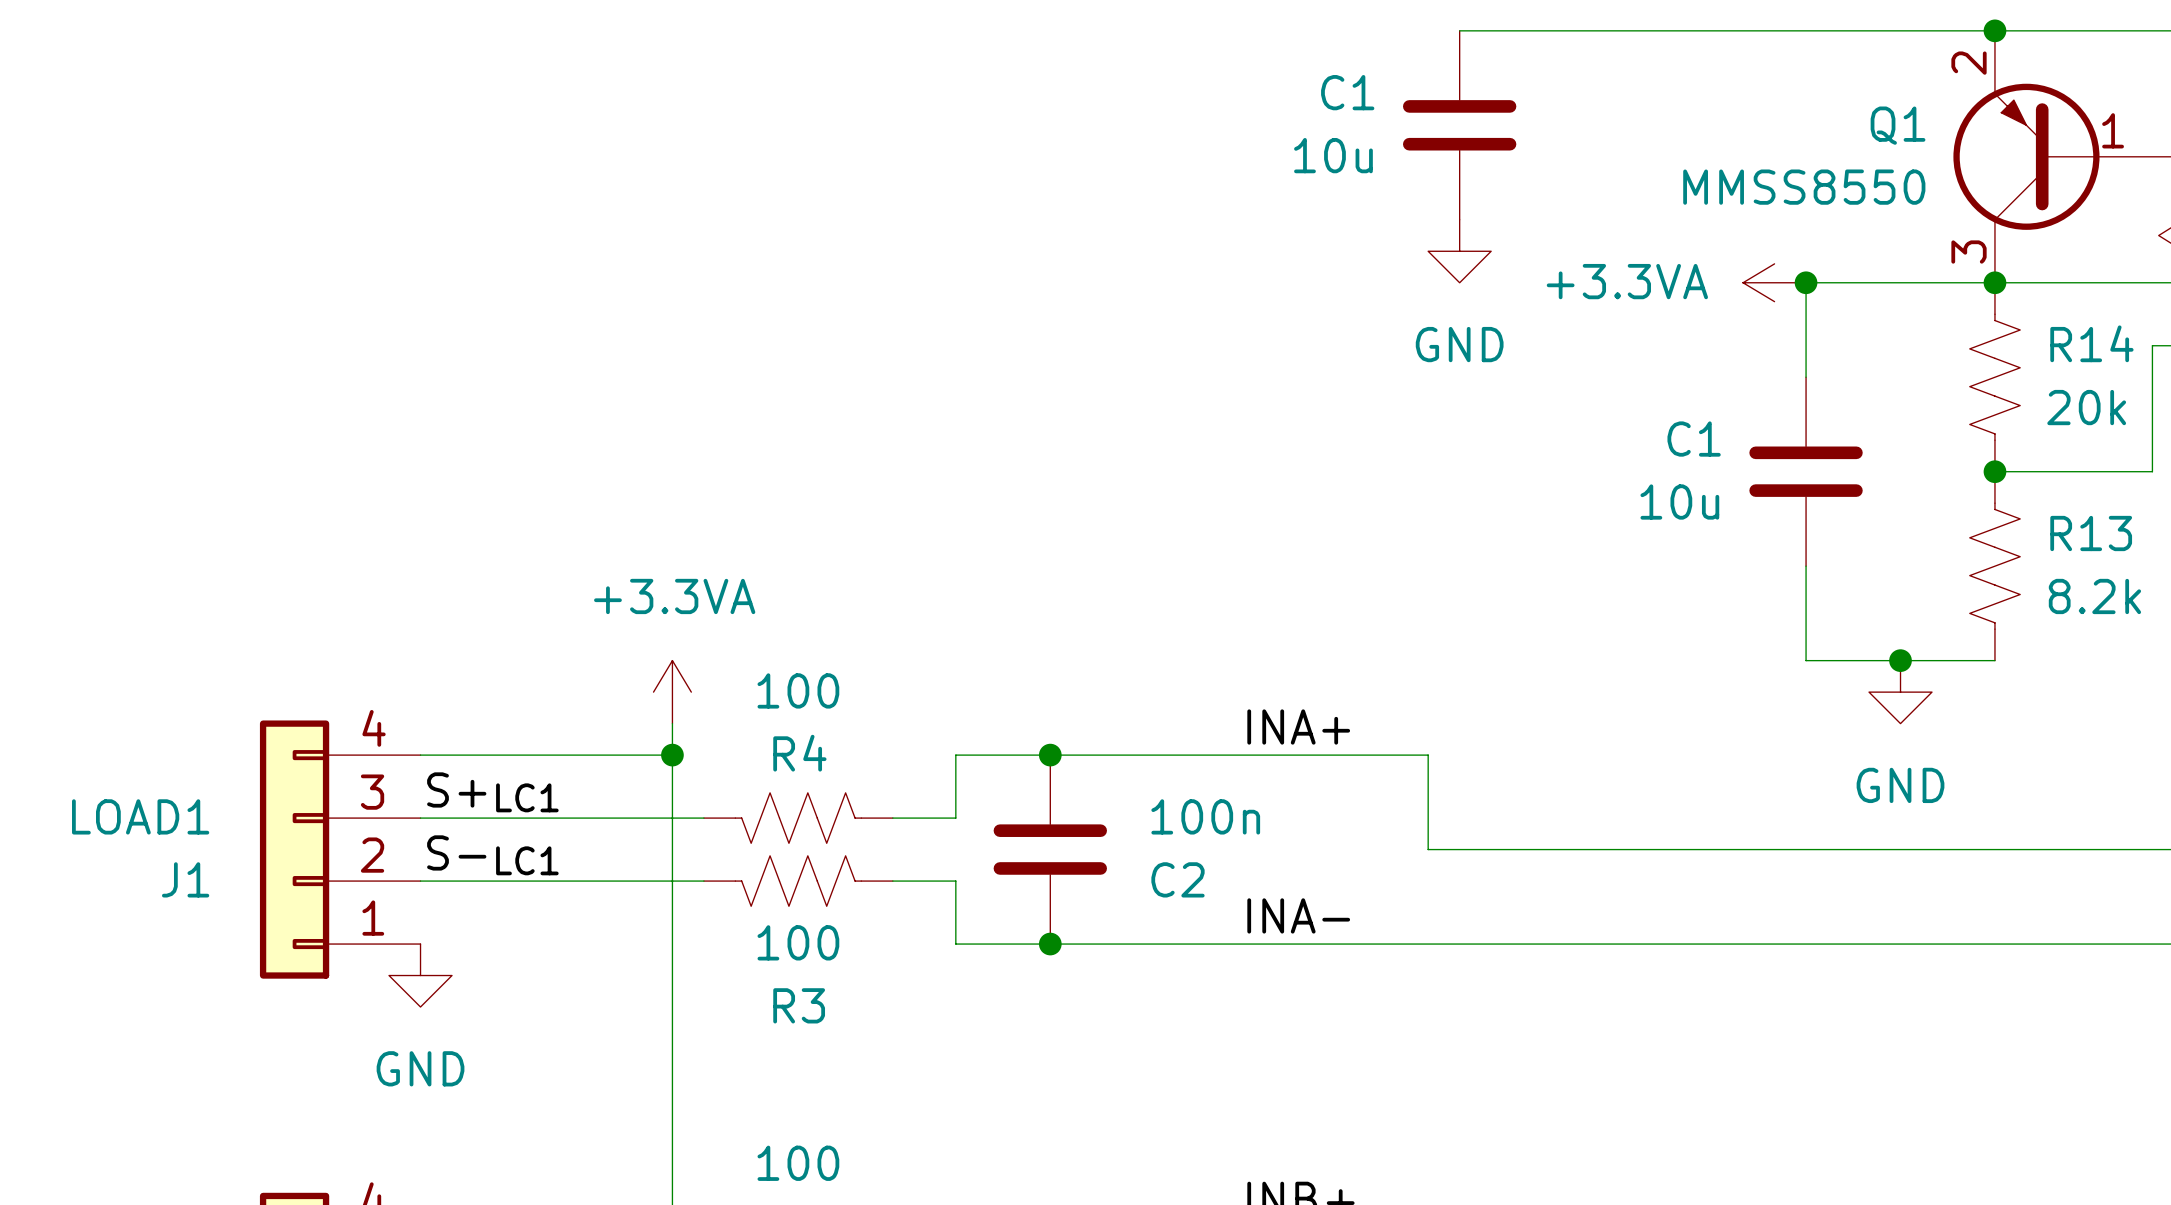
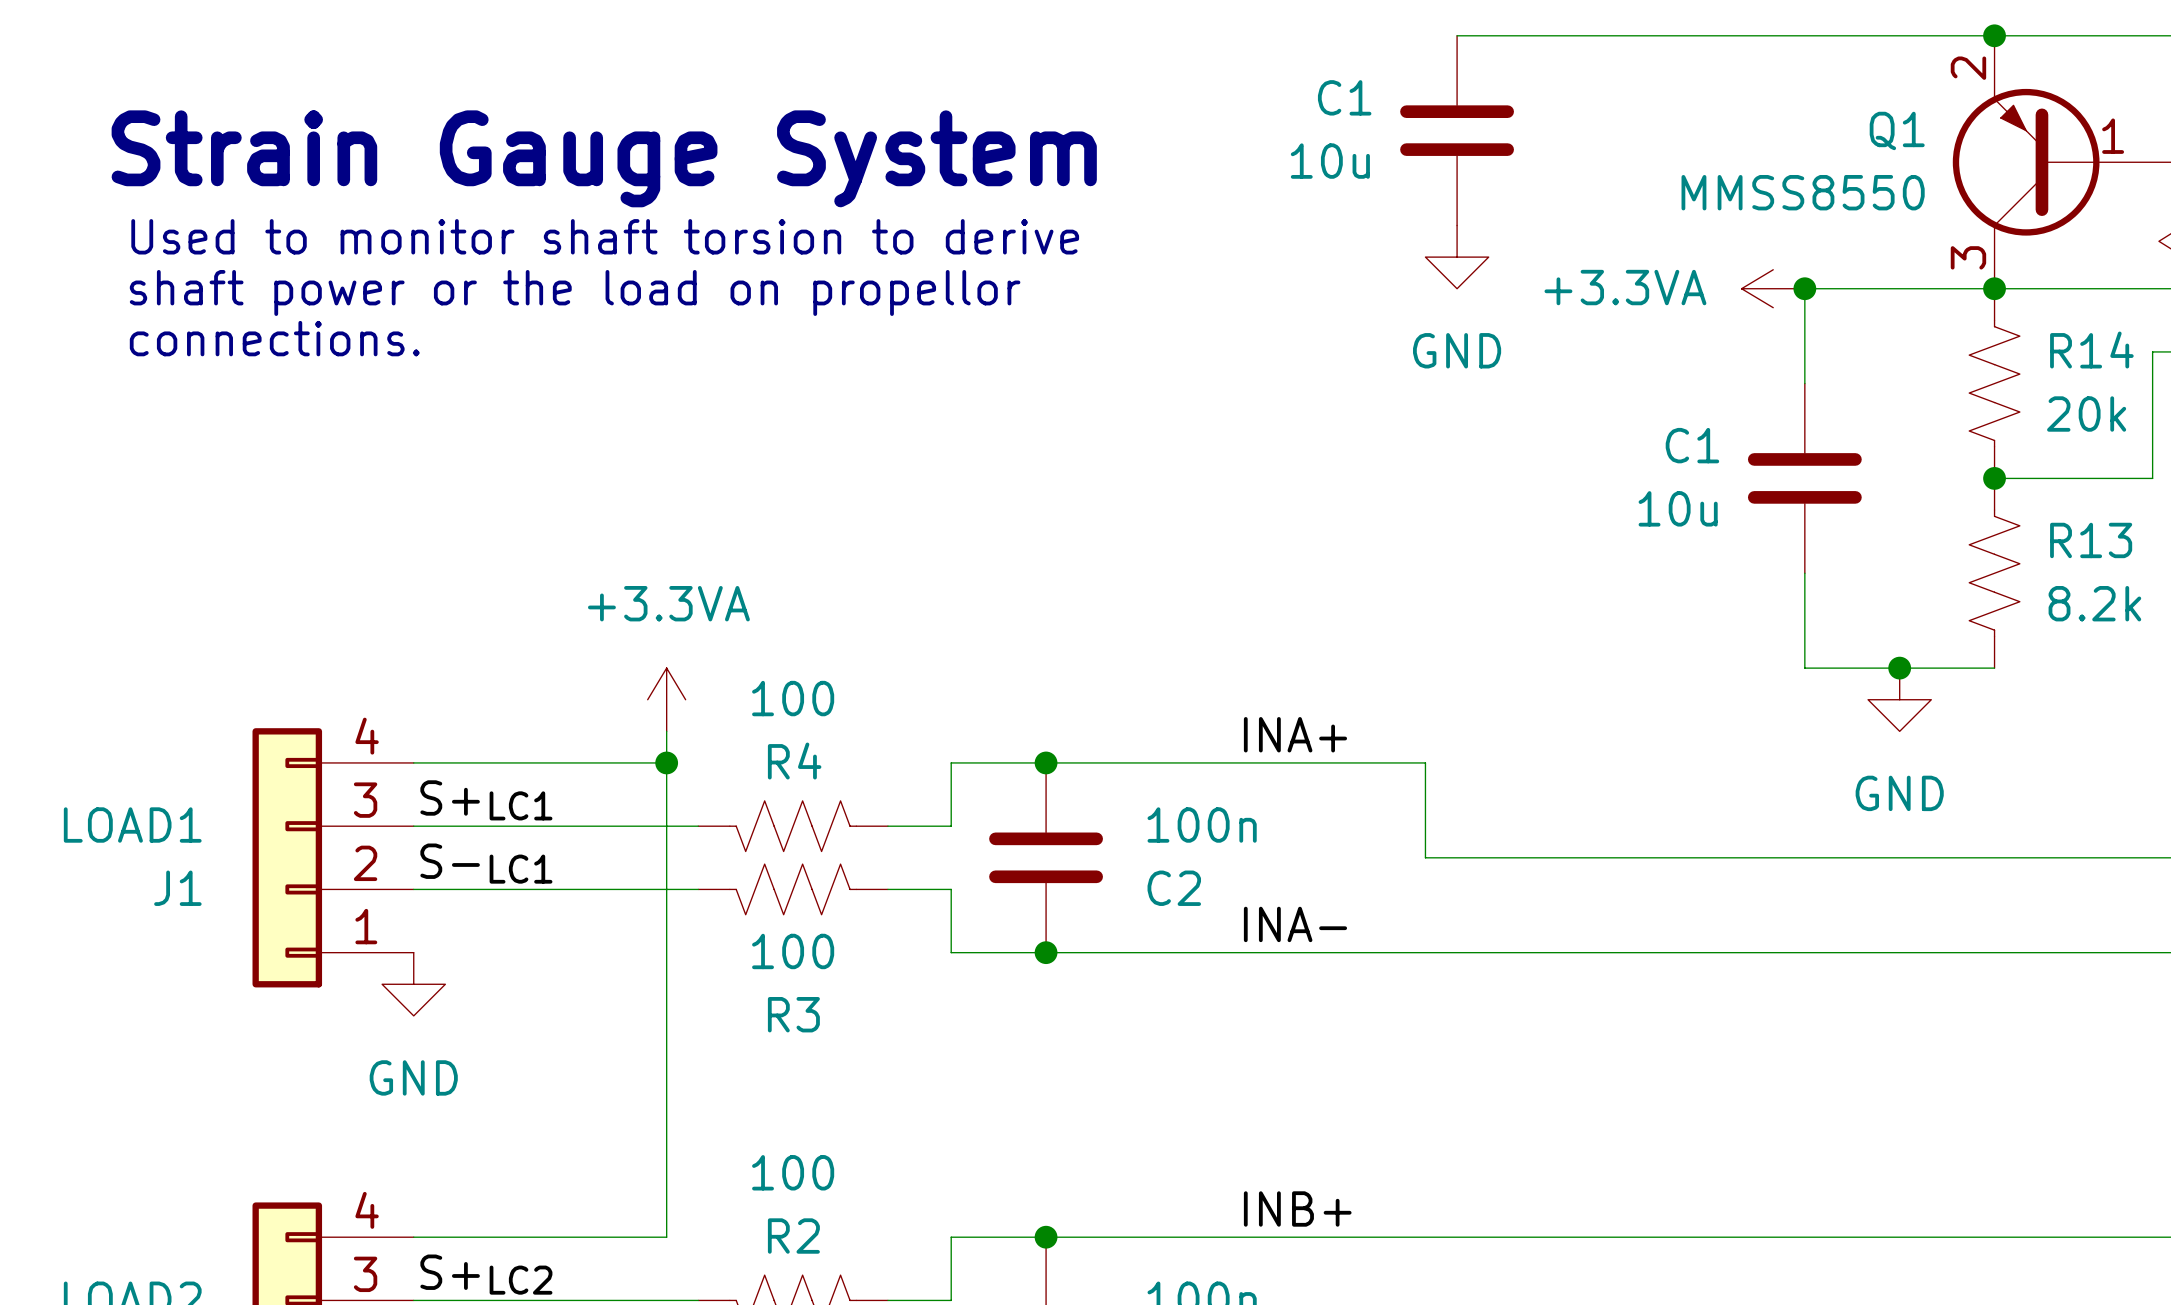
text: none -> Strain Gauge System (604, 158)
text: none -> Used to monitor shaft torsion to derive (605, 236)
text: none -> shaft power or the load on propellor (575, 292)
text: none -> connections. (274, 338)

